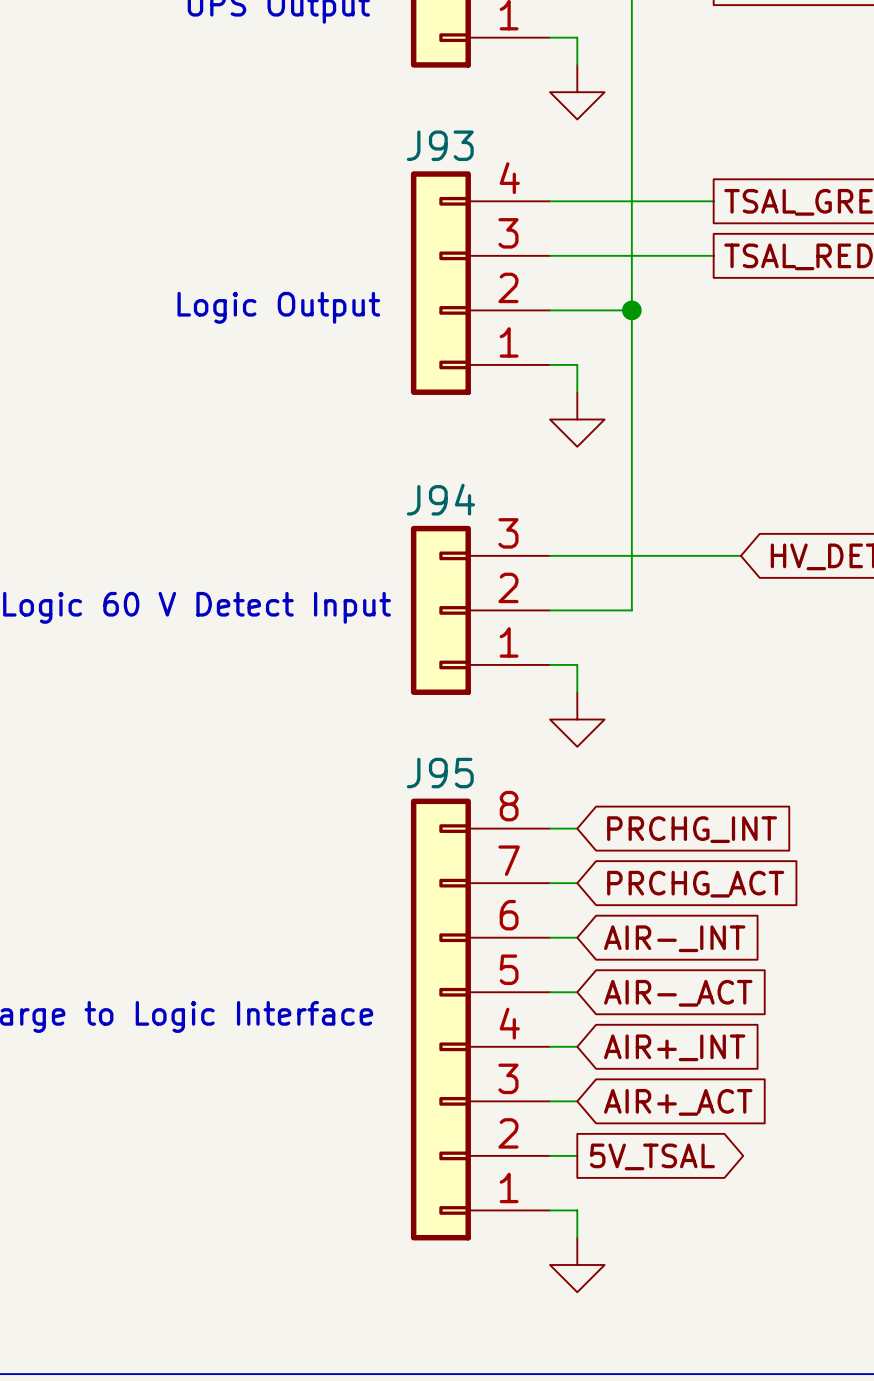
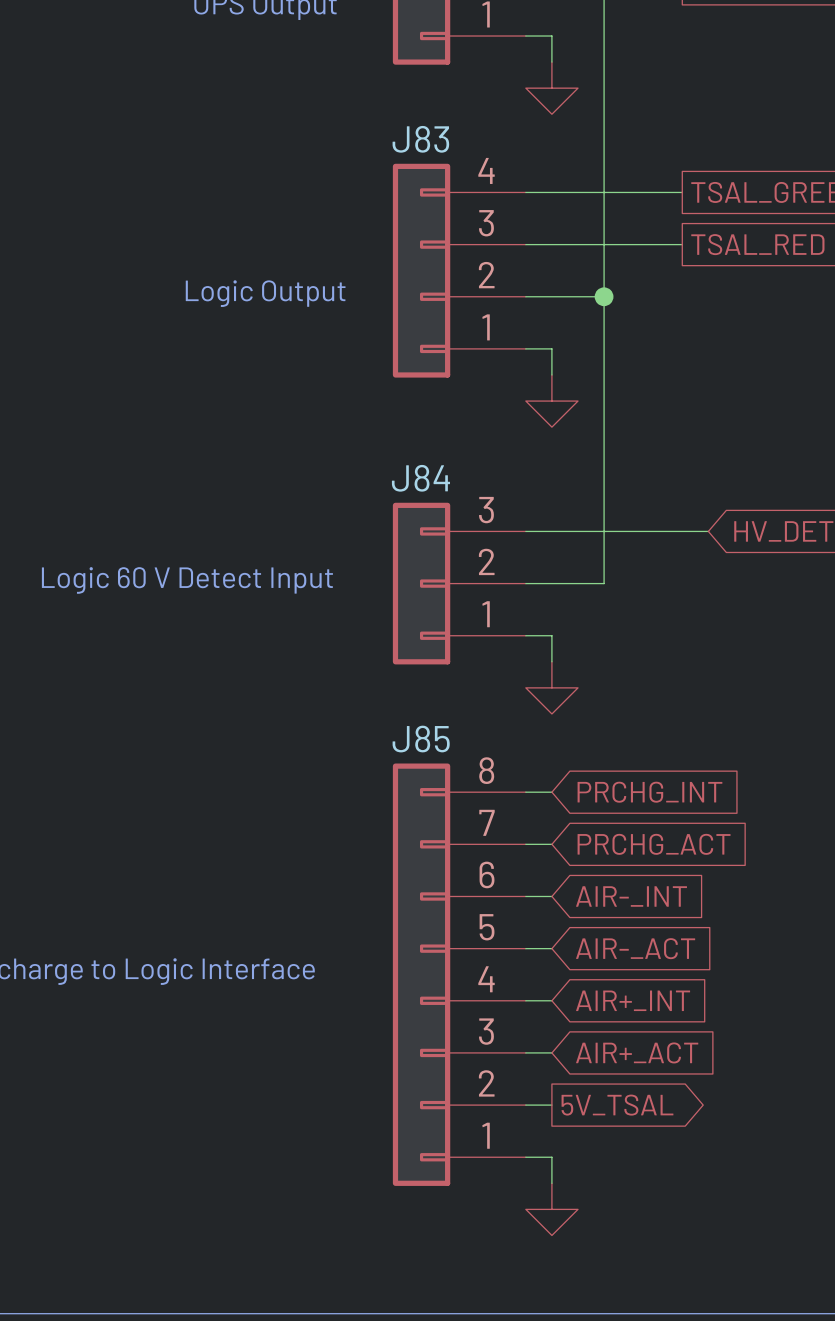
J93 name: J93 (440, 145) -> J83 (420, 139)
J94 name: J94 (440, 499) -> J84 (420, 478)
J95 name: J95 (440, 773) -> J85 (421, 739)

